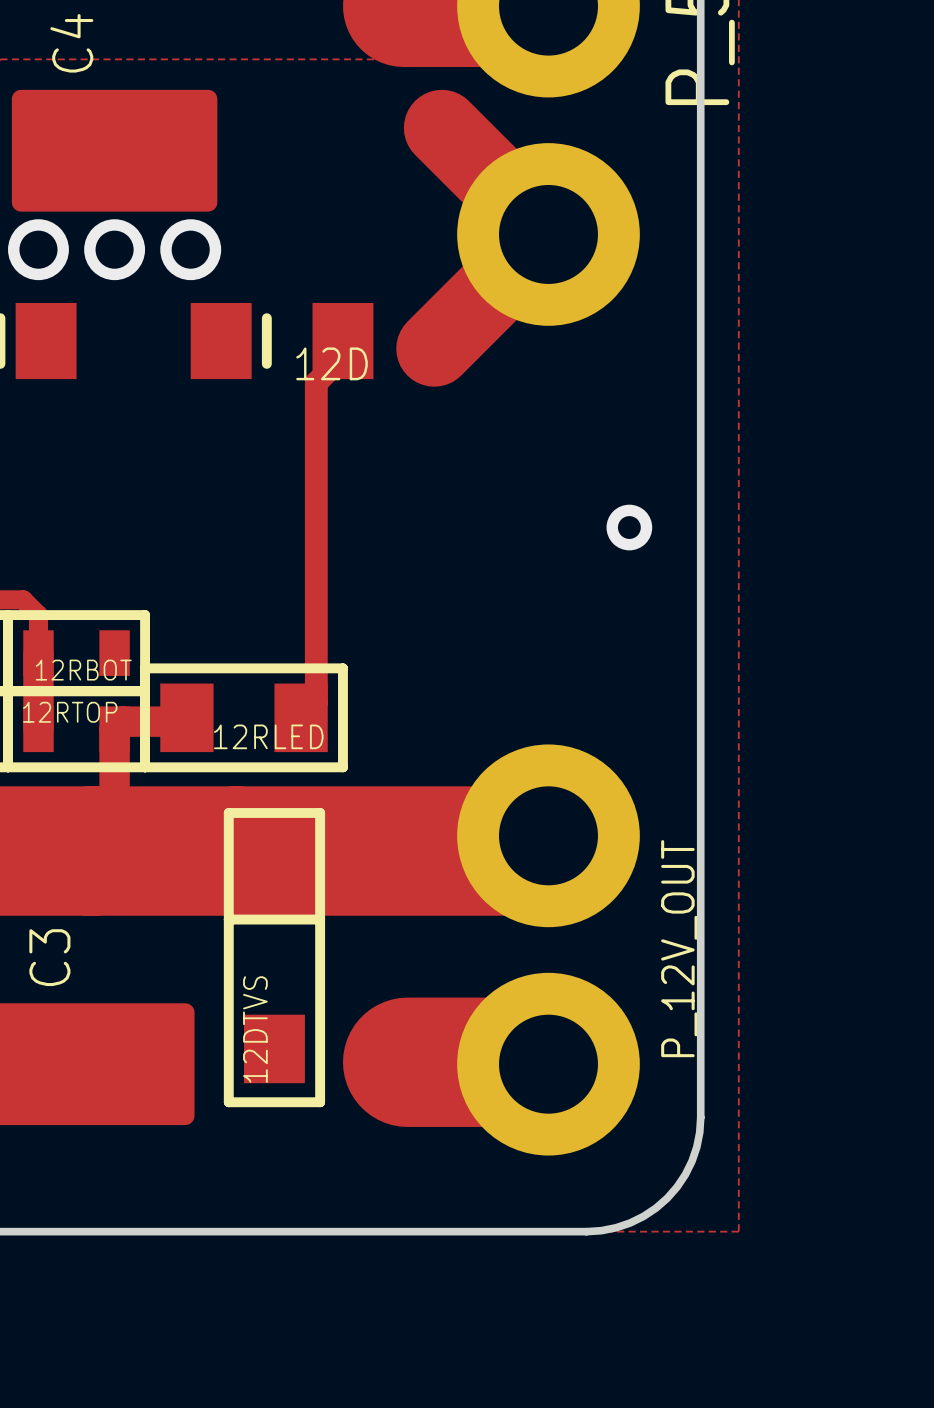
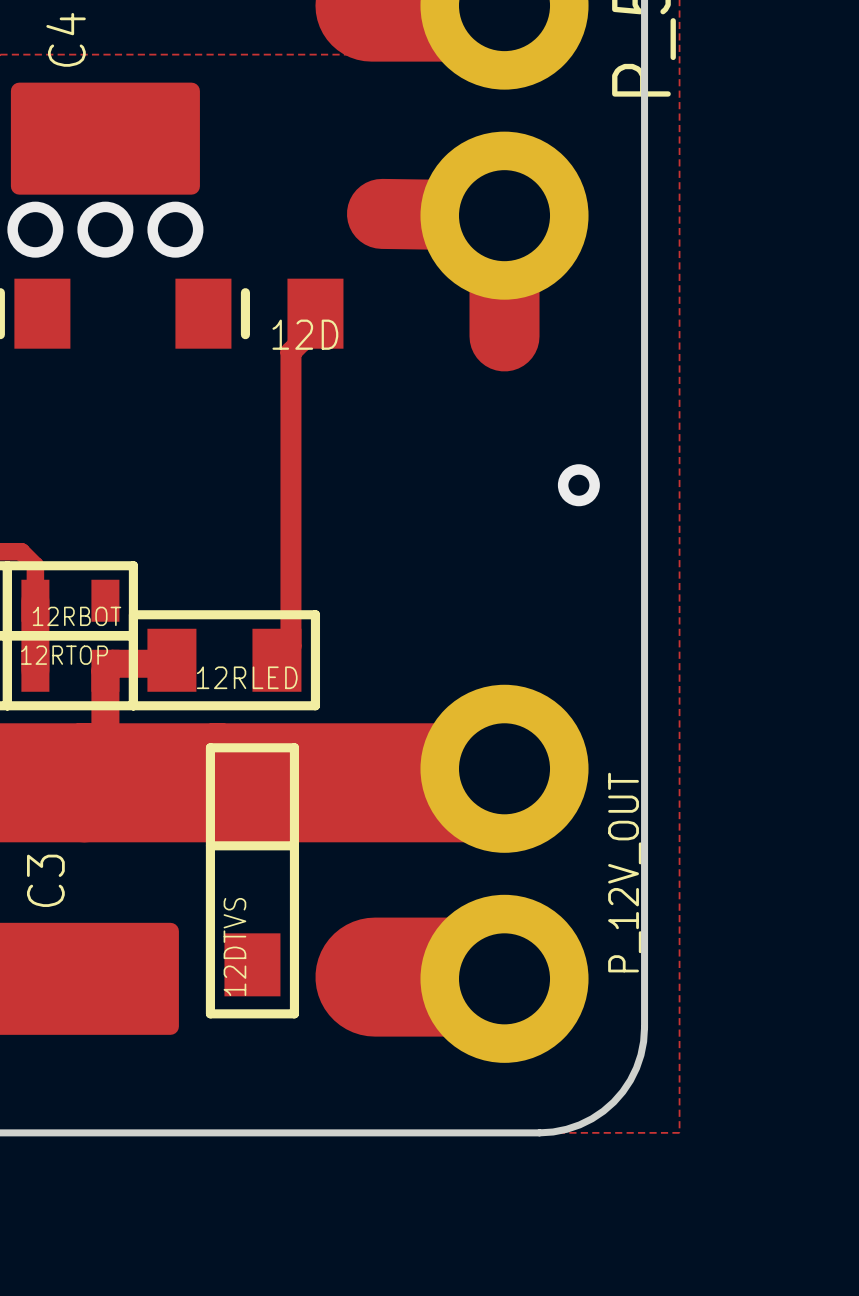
track: (441, 127) (548, 234) (434, 348) -> none
track: none -> (381, 213) (504, 215) (504, 336)

